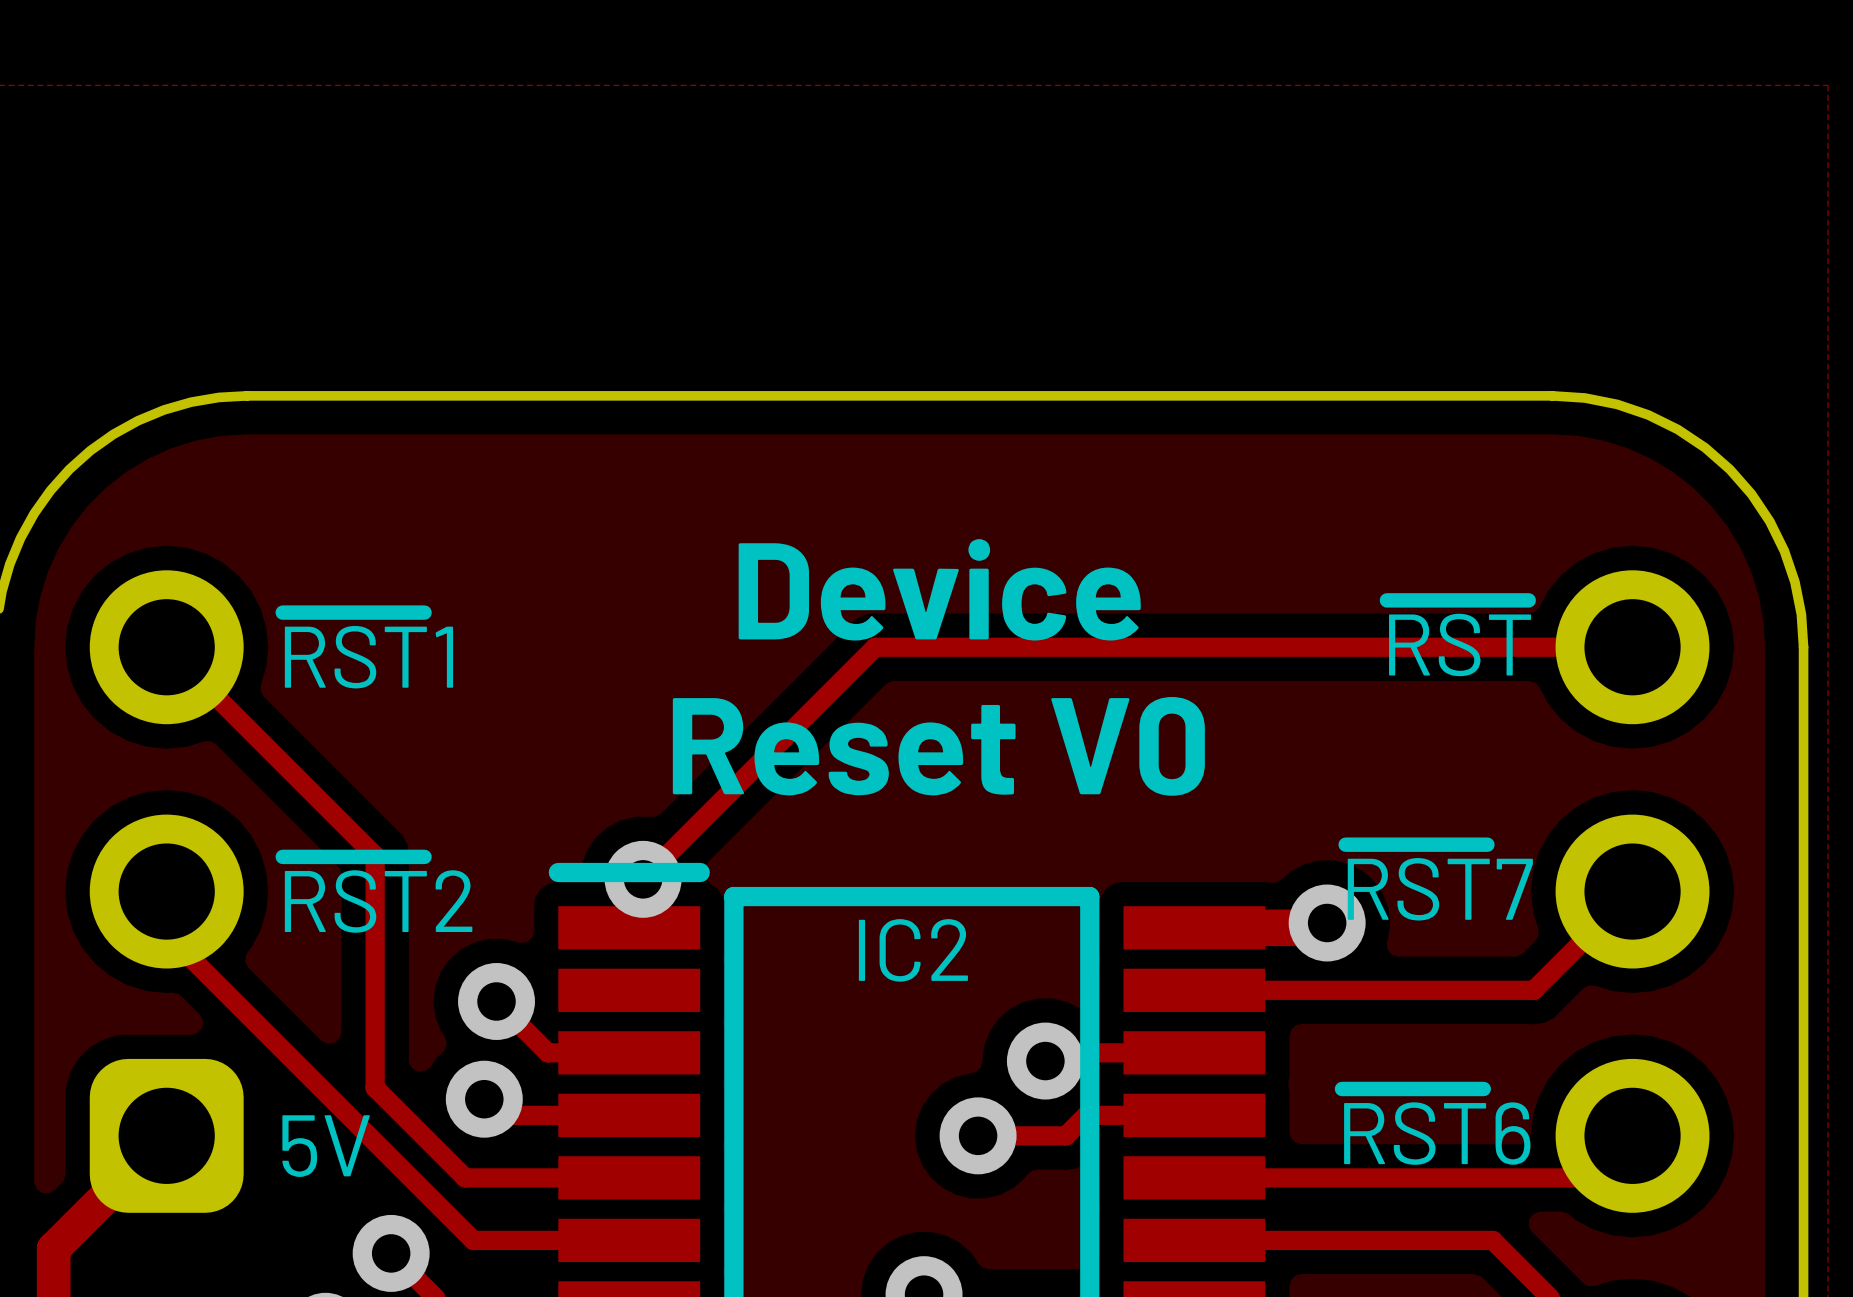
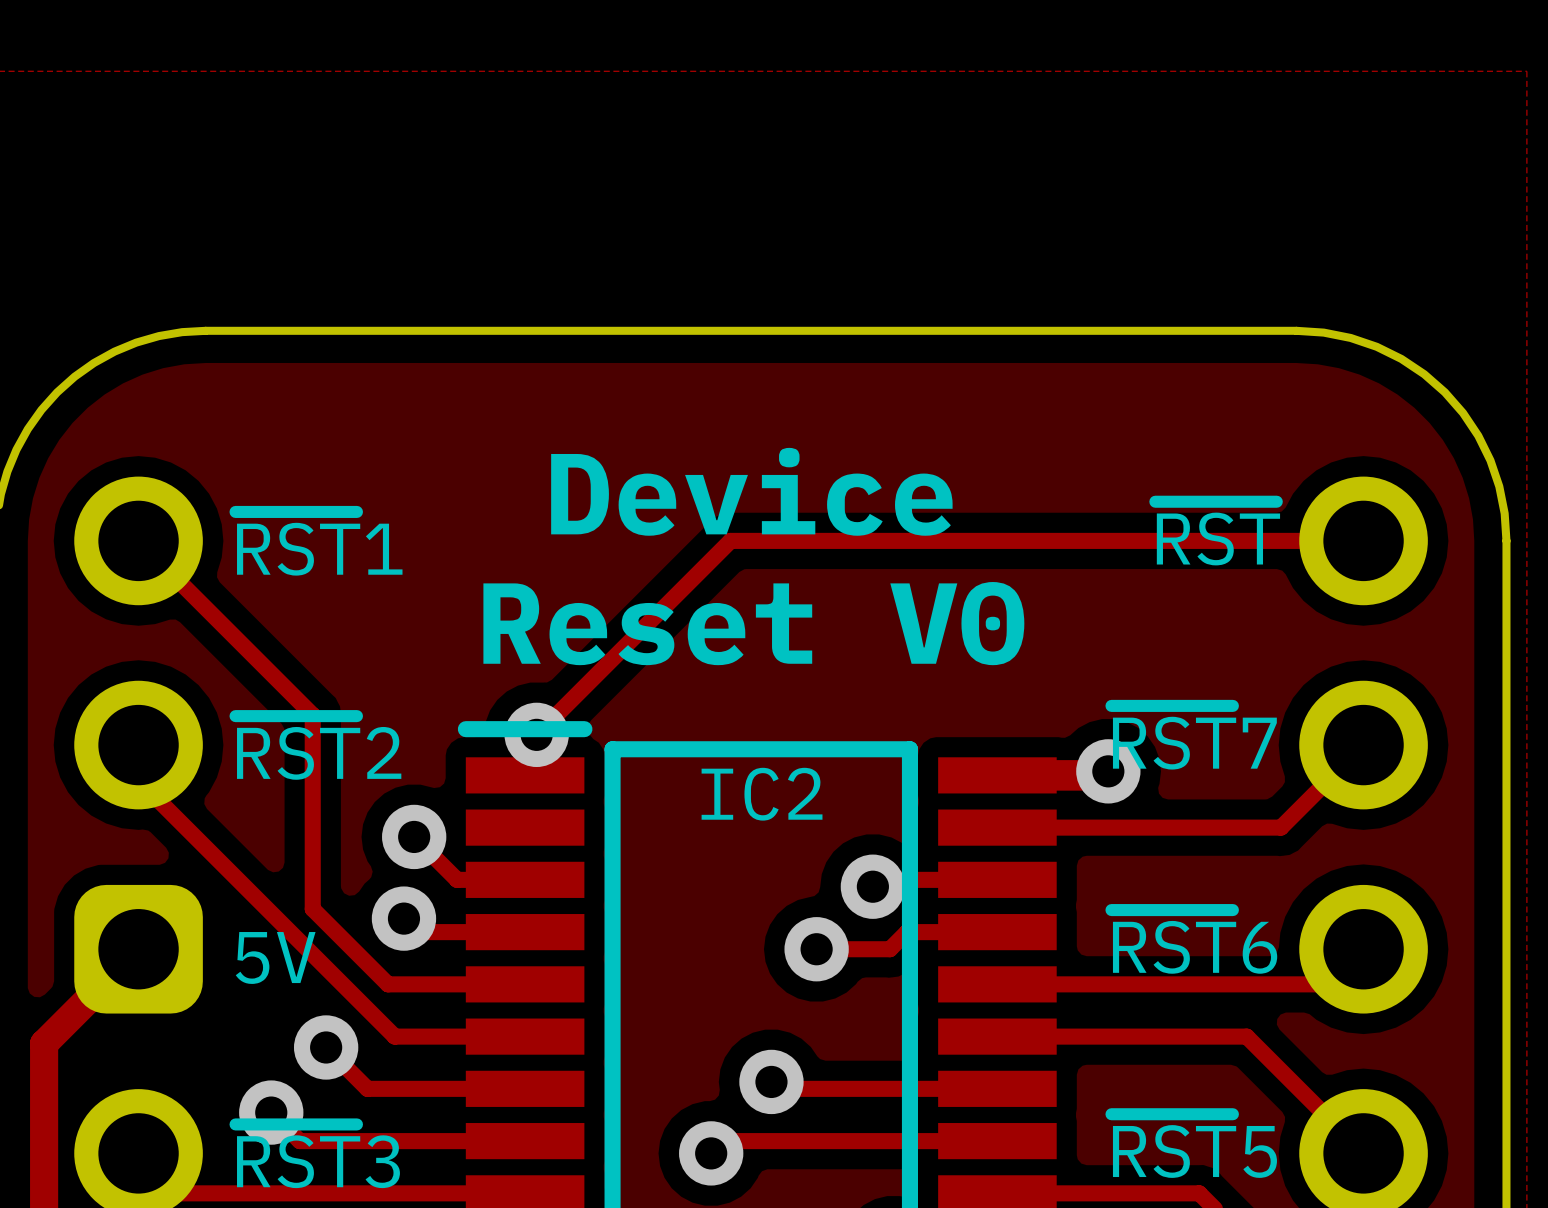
text position: Device (939, 589) -> Device (751, 491)
text position: Reset V0 (938, 746) -> Reset V0 (753, 623)

